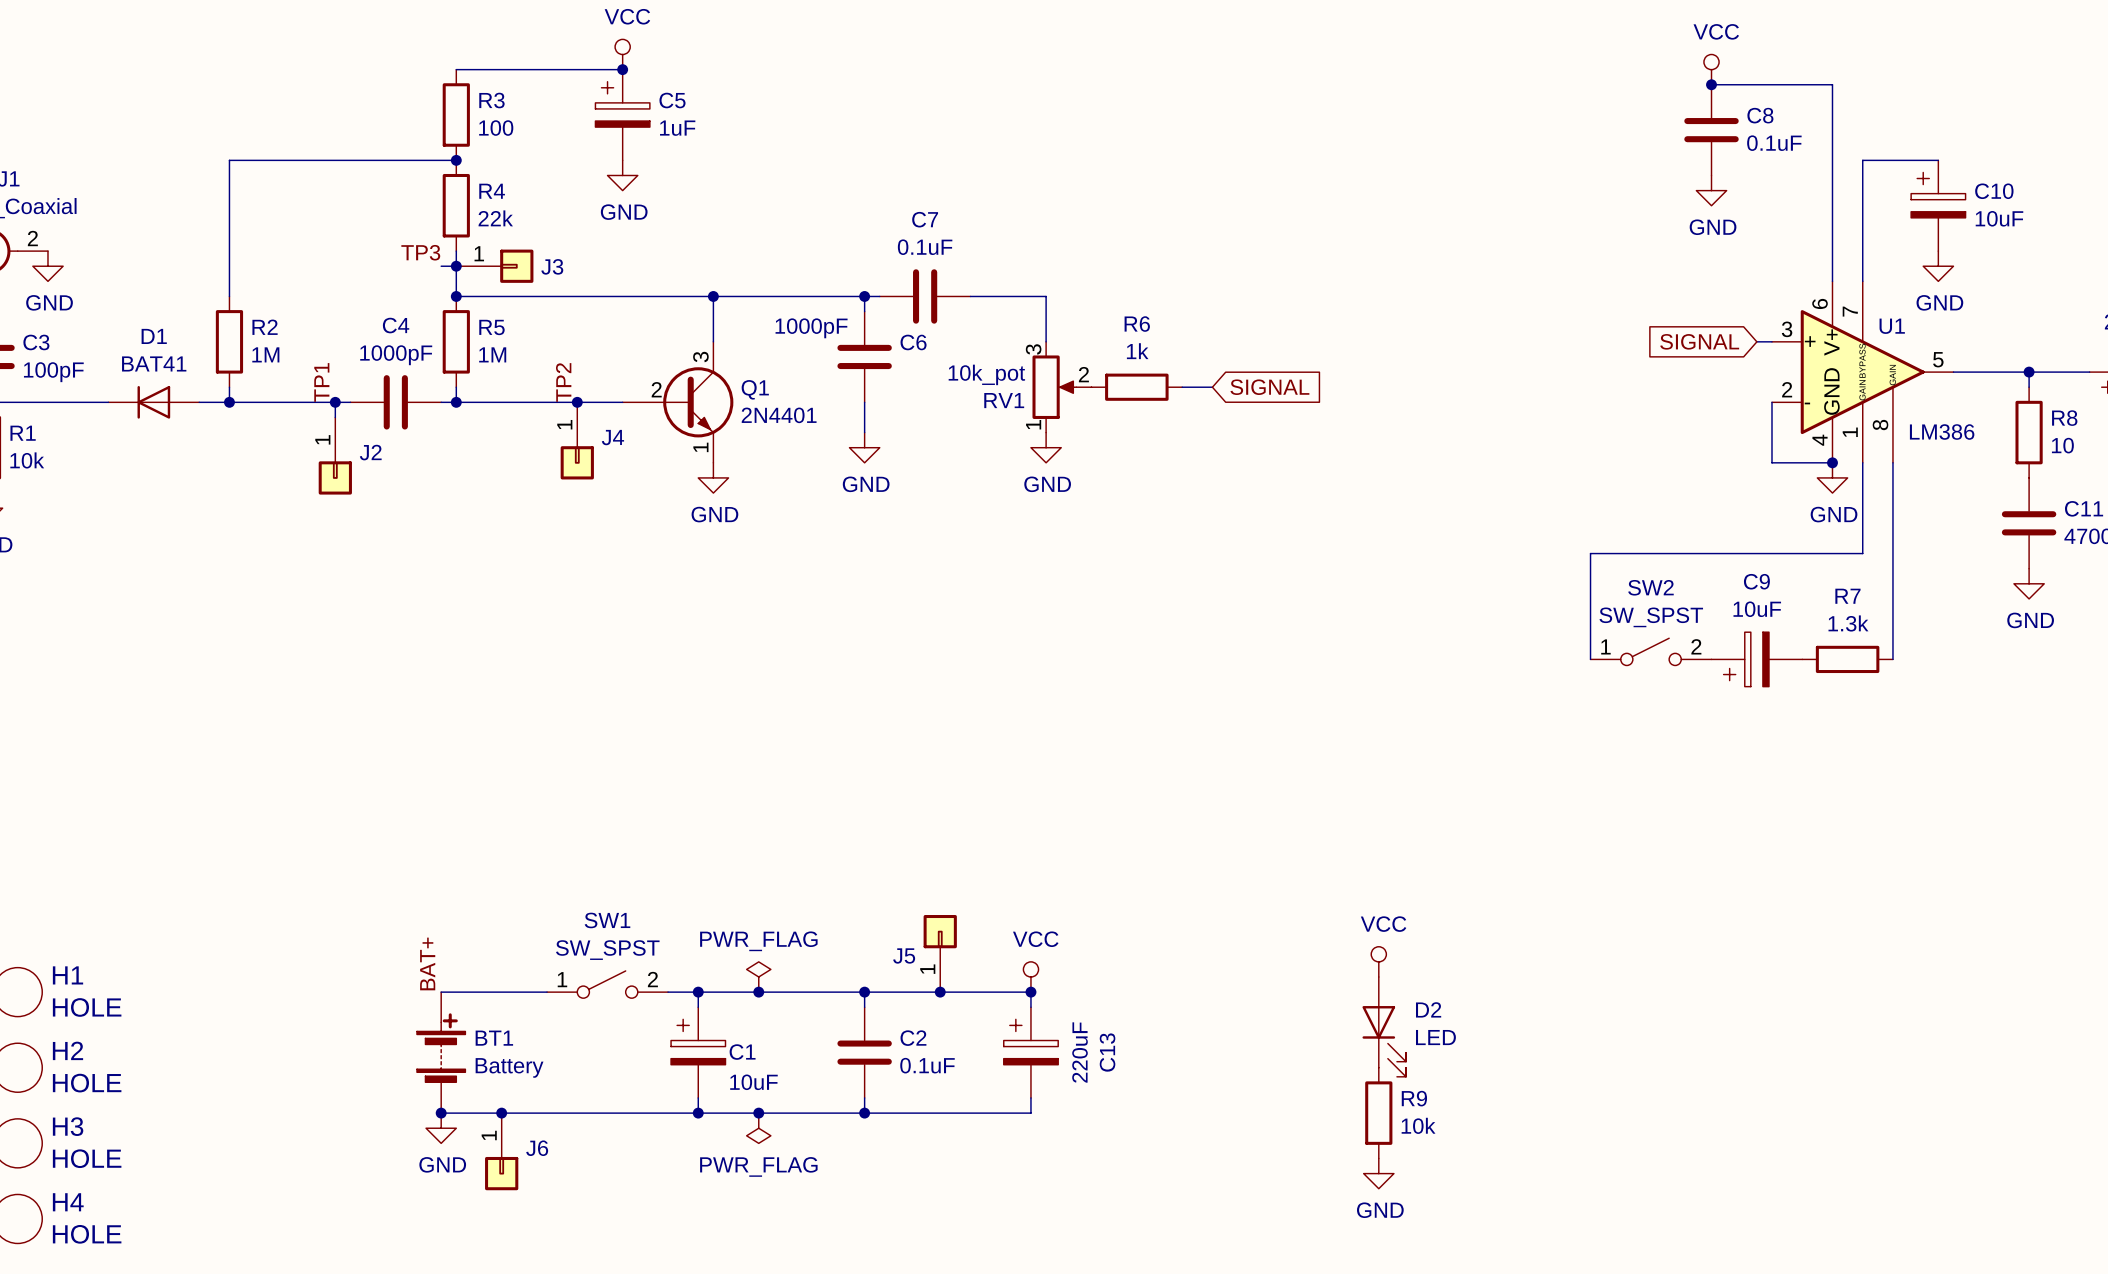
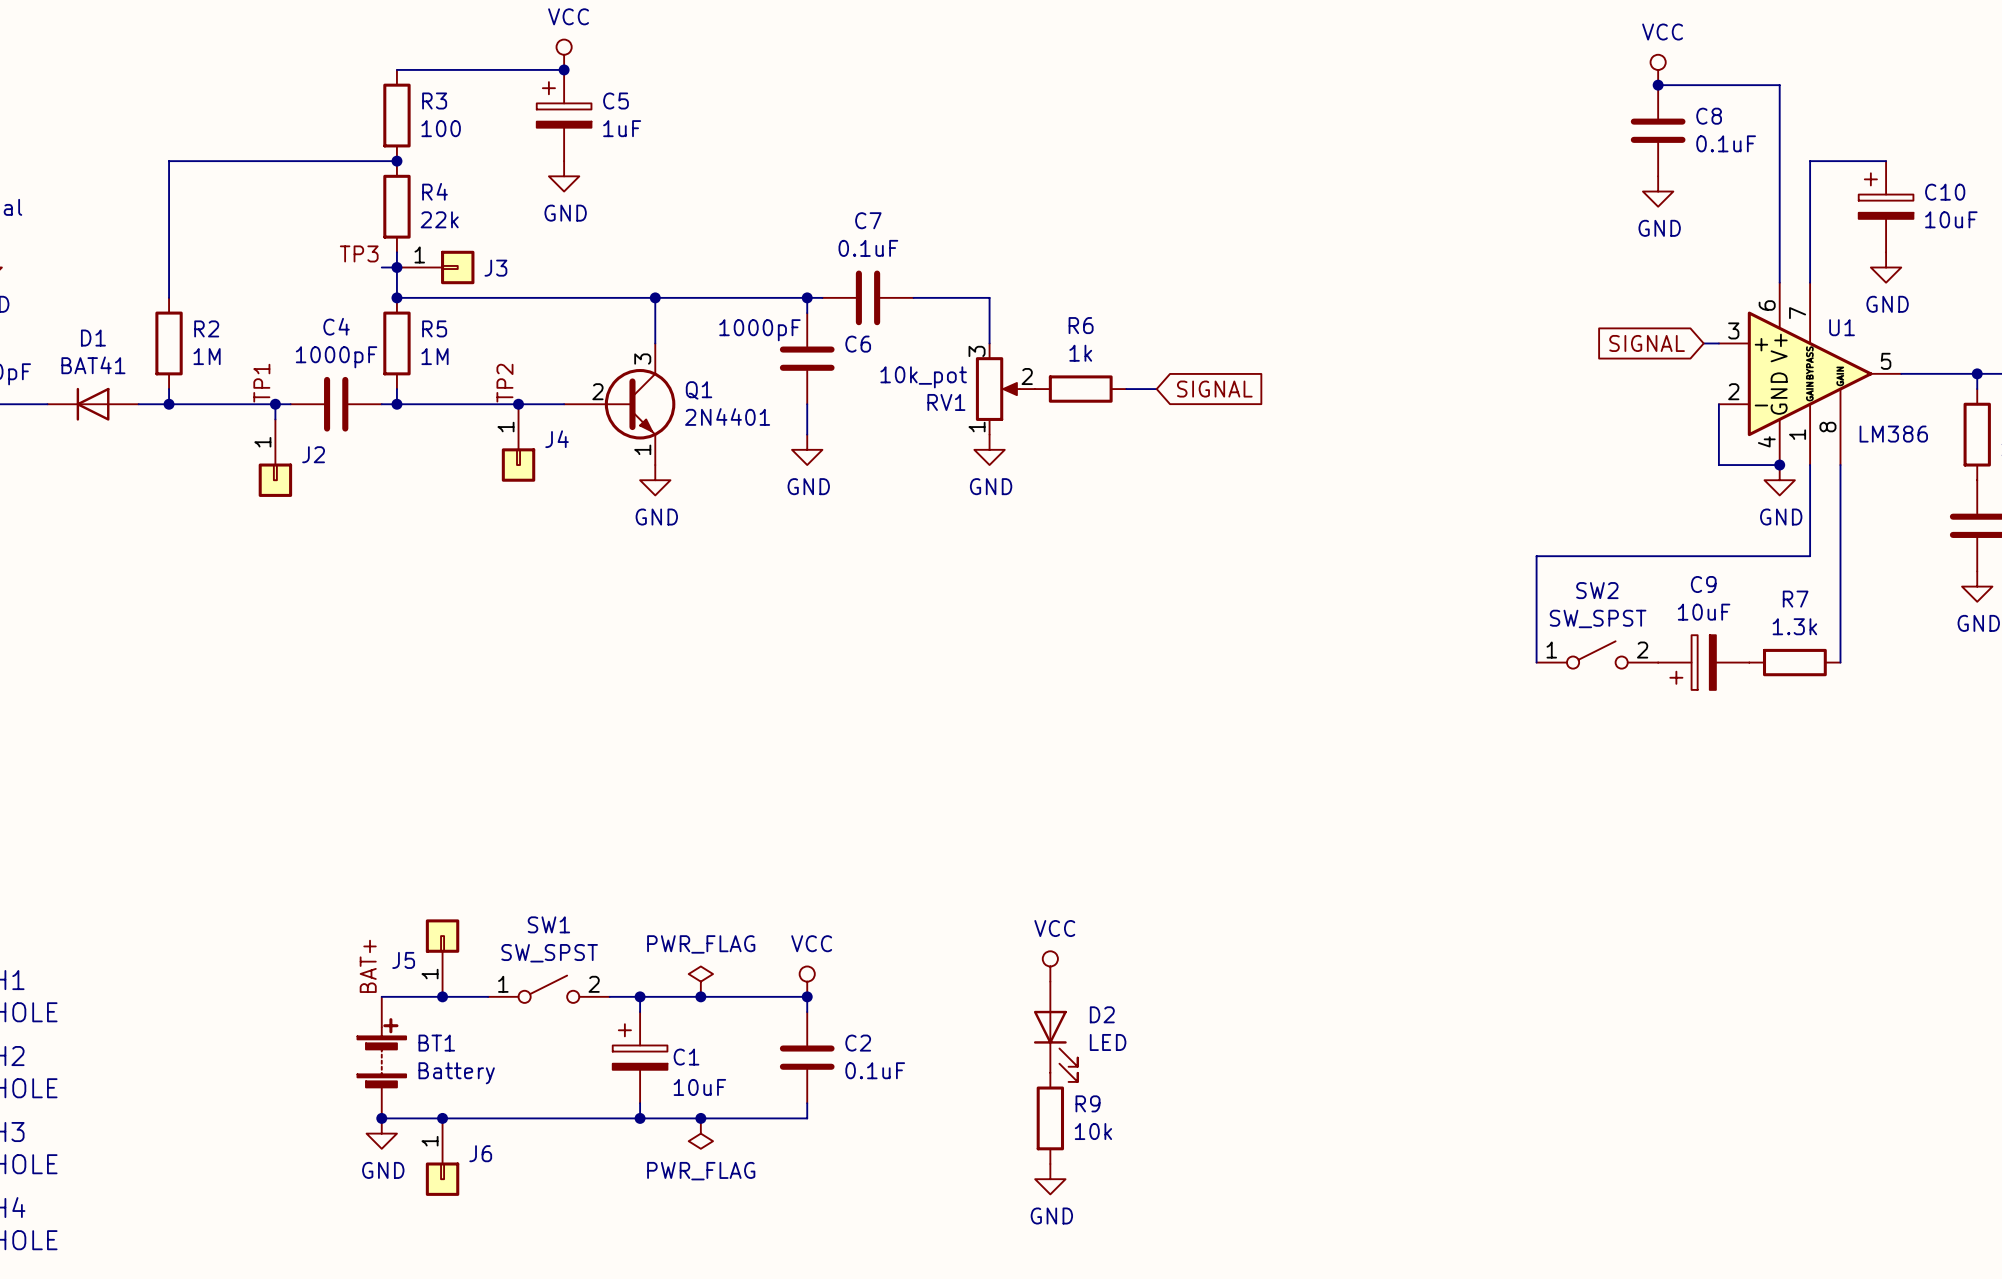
J5 position: (940, 953) -> (442, 958)
power symbol: VCC (1378, 961) -> none
power symbol: none -> VCC (807, 981)
power symbol position: VCC (1030, 977) -> VCC (1050, 966)
junction: none -> (442, 996)
wire: (864, 992) (1030, 992) (1030, 1007) -> none
junction: (940, 992) -> none
junction: (1030, 992) -> none
D2 position: (1384, 1026) -> (1055, 1031)
C13: 220uF (1030, 1052) -> none
wire: (1030, 1097) (1030, 1113) (864, 1113) -> none
junction: (864, 1113) -> none
R9 position: (1378, 1113) -> (1050, 1118)
power symbol position: GND (1378, 1173) -> GND (1050, 1179)

